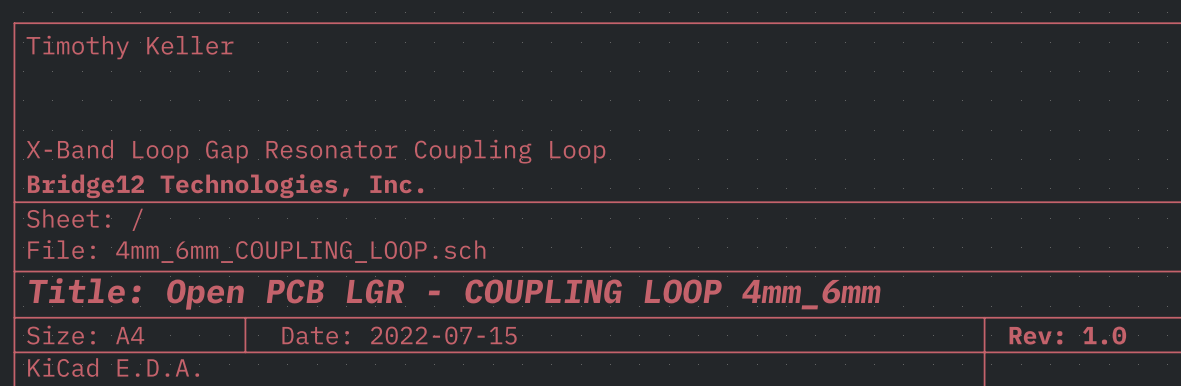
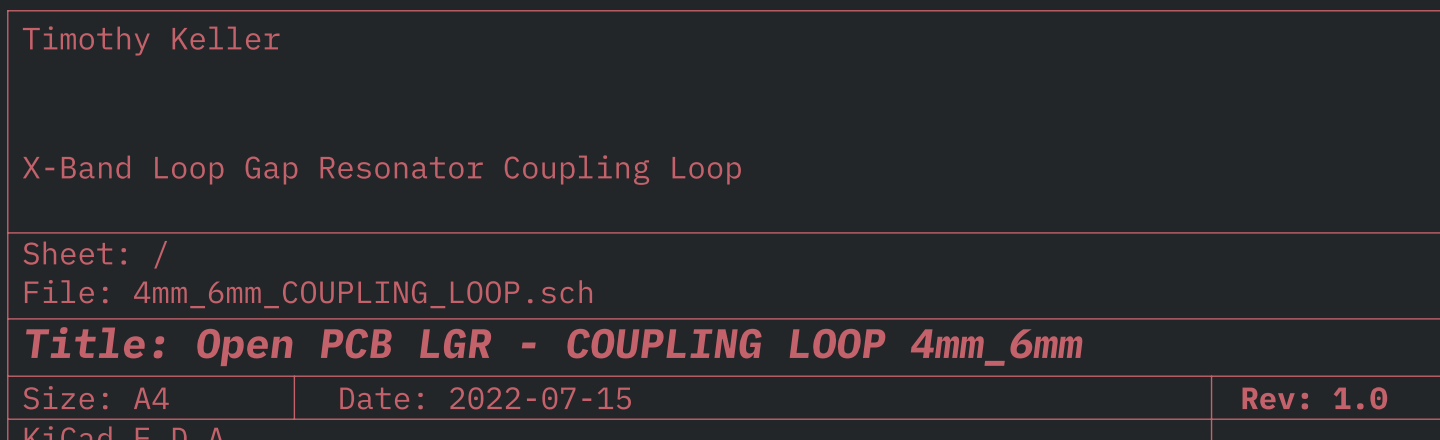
title block: Bridge12 Technologies, Inc. (225, 186) -> none

